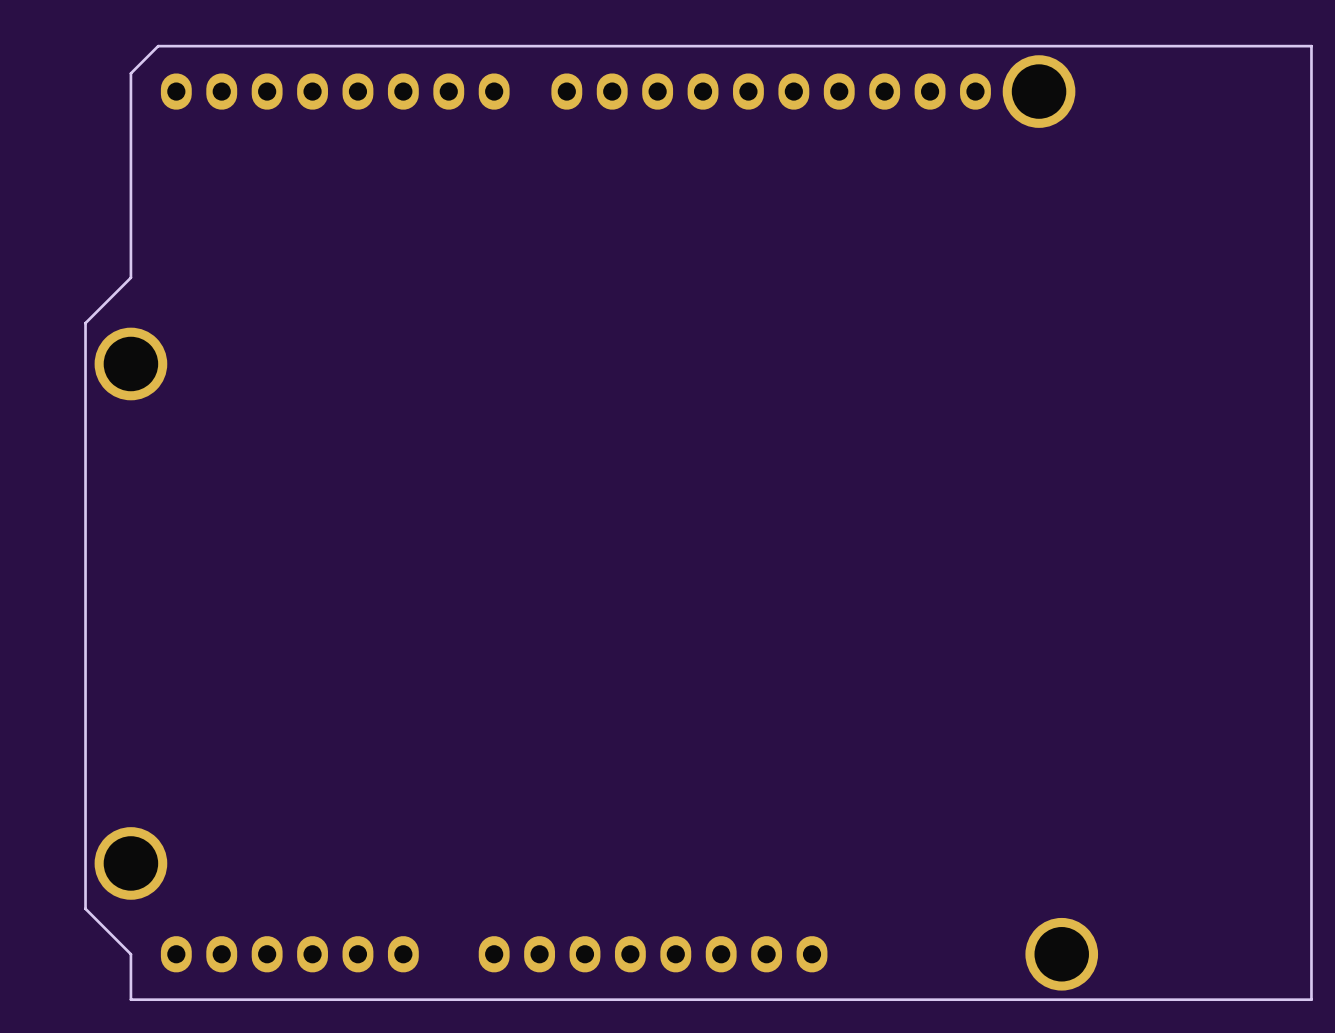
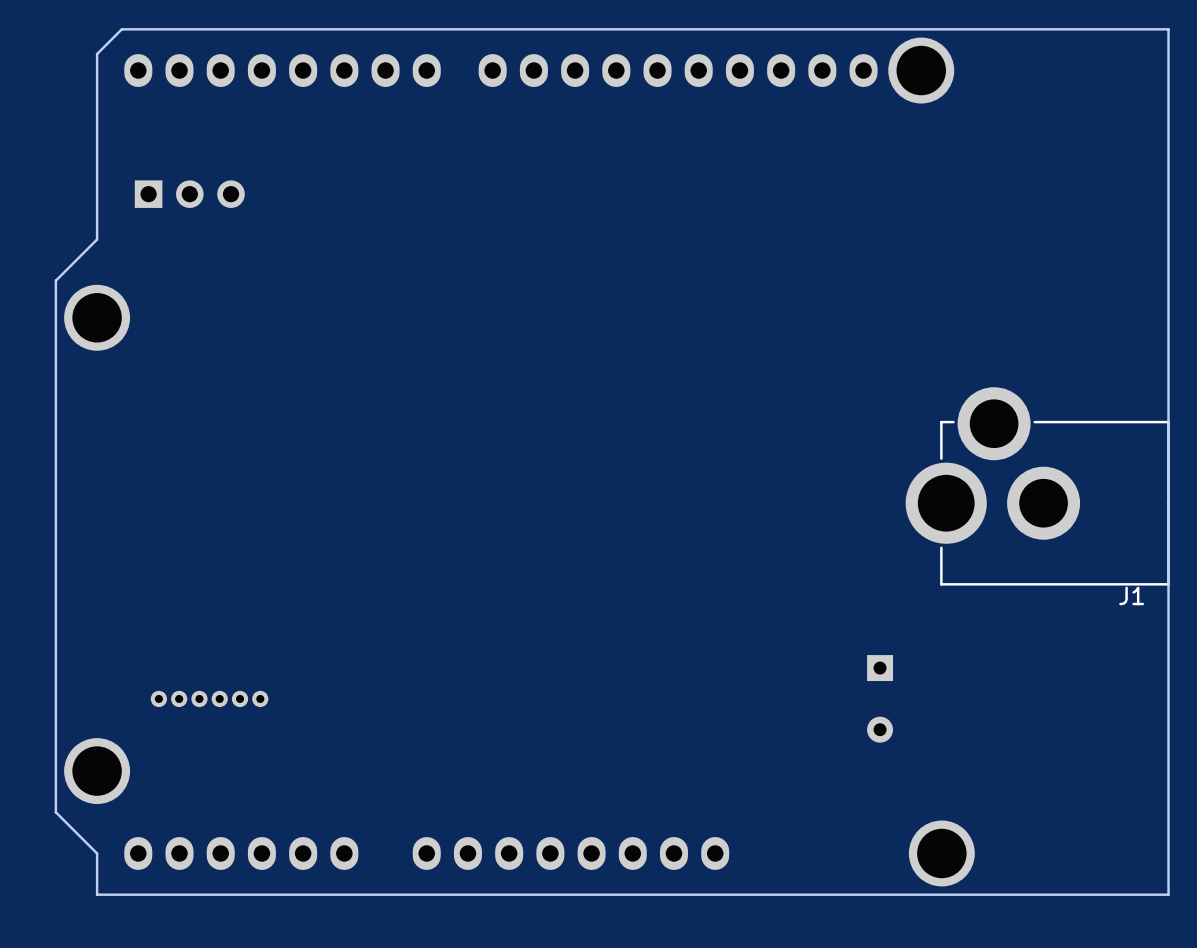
part: none -> (189, 194)
J1: none -> (1037, 486)
part: none -> (209, 698)
part: none -> (880, 698)

